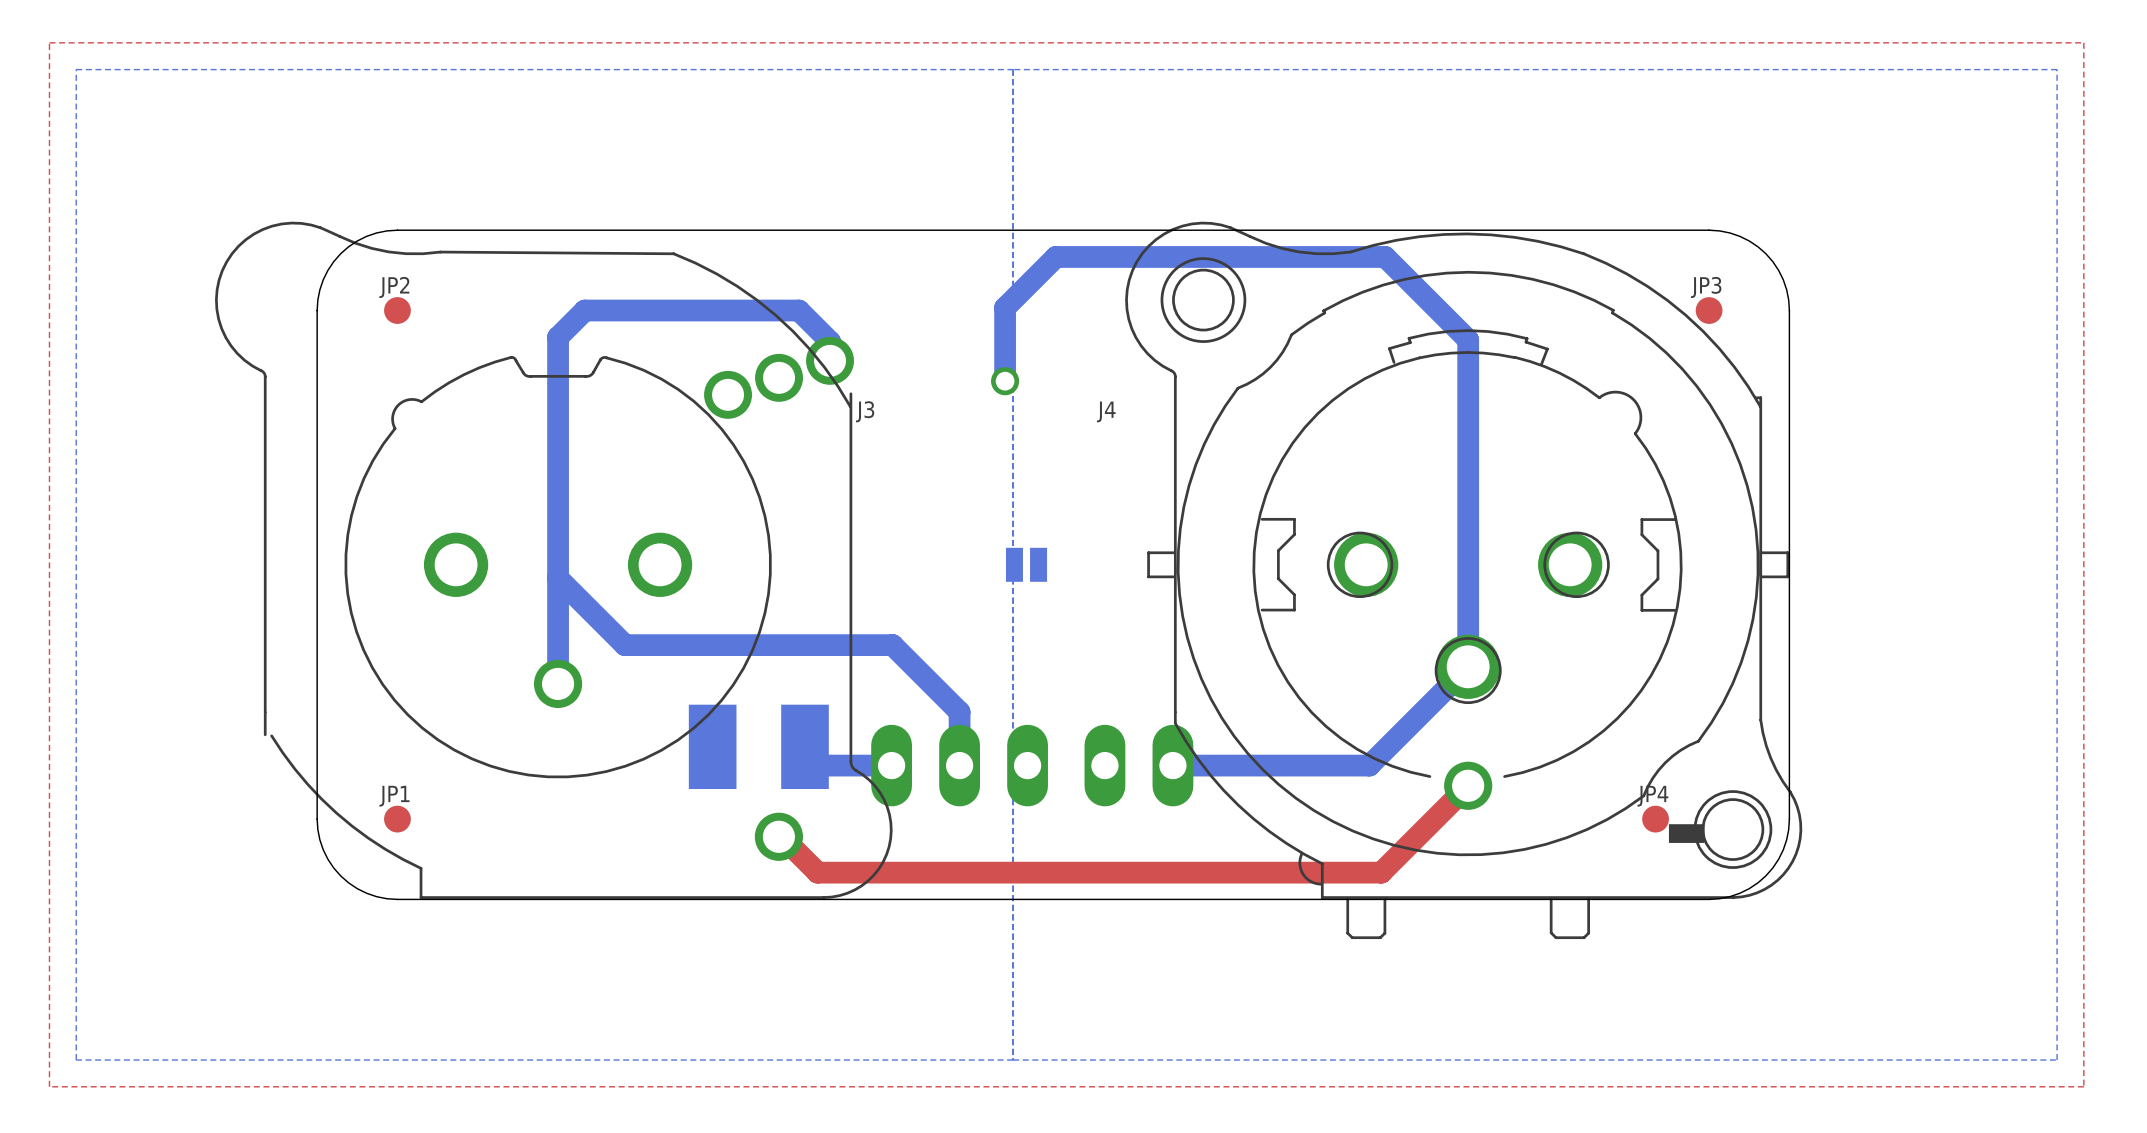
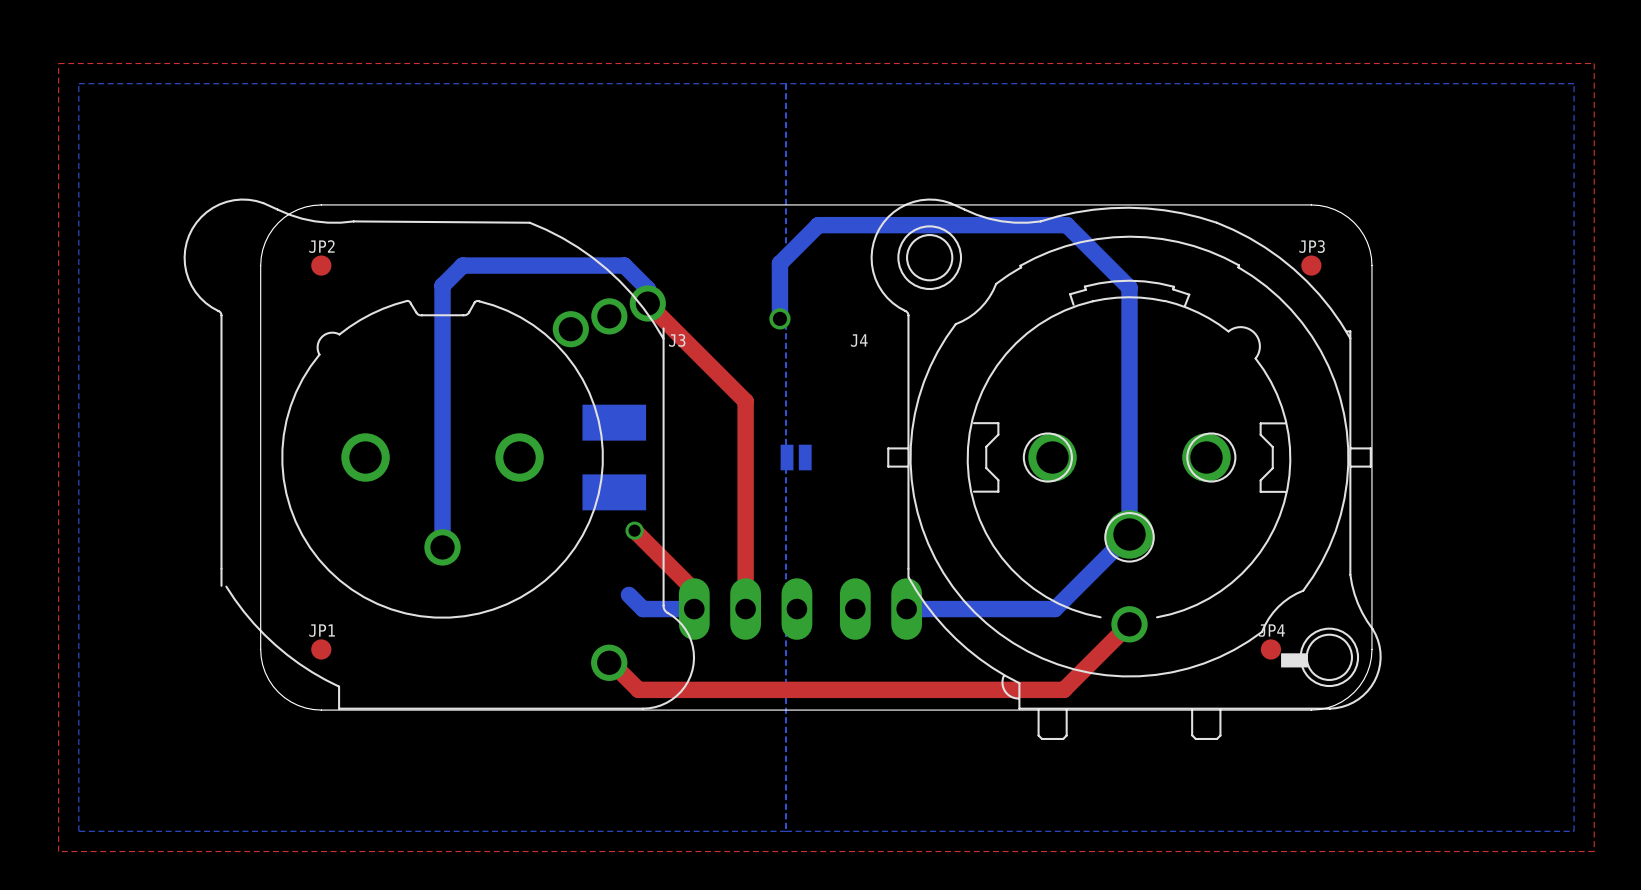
top track: none -> (647, 303) (745, 401) (745, 609)
bottom track: (558, 578) (624, 645) (892, 645) (959, 712) (959, 765) -> none
top track: none -> (634, 530) (694, 590) (694, 609)
via: none -> (634, 530)
part rotation: 0° (758, 746) -> 90° clockwise (614, 457)
part position: (758, 746) -> (614, 457)

